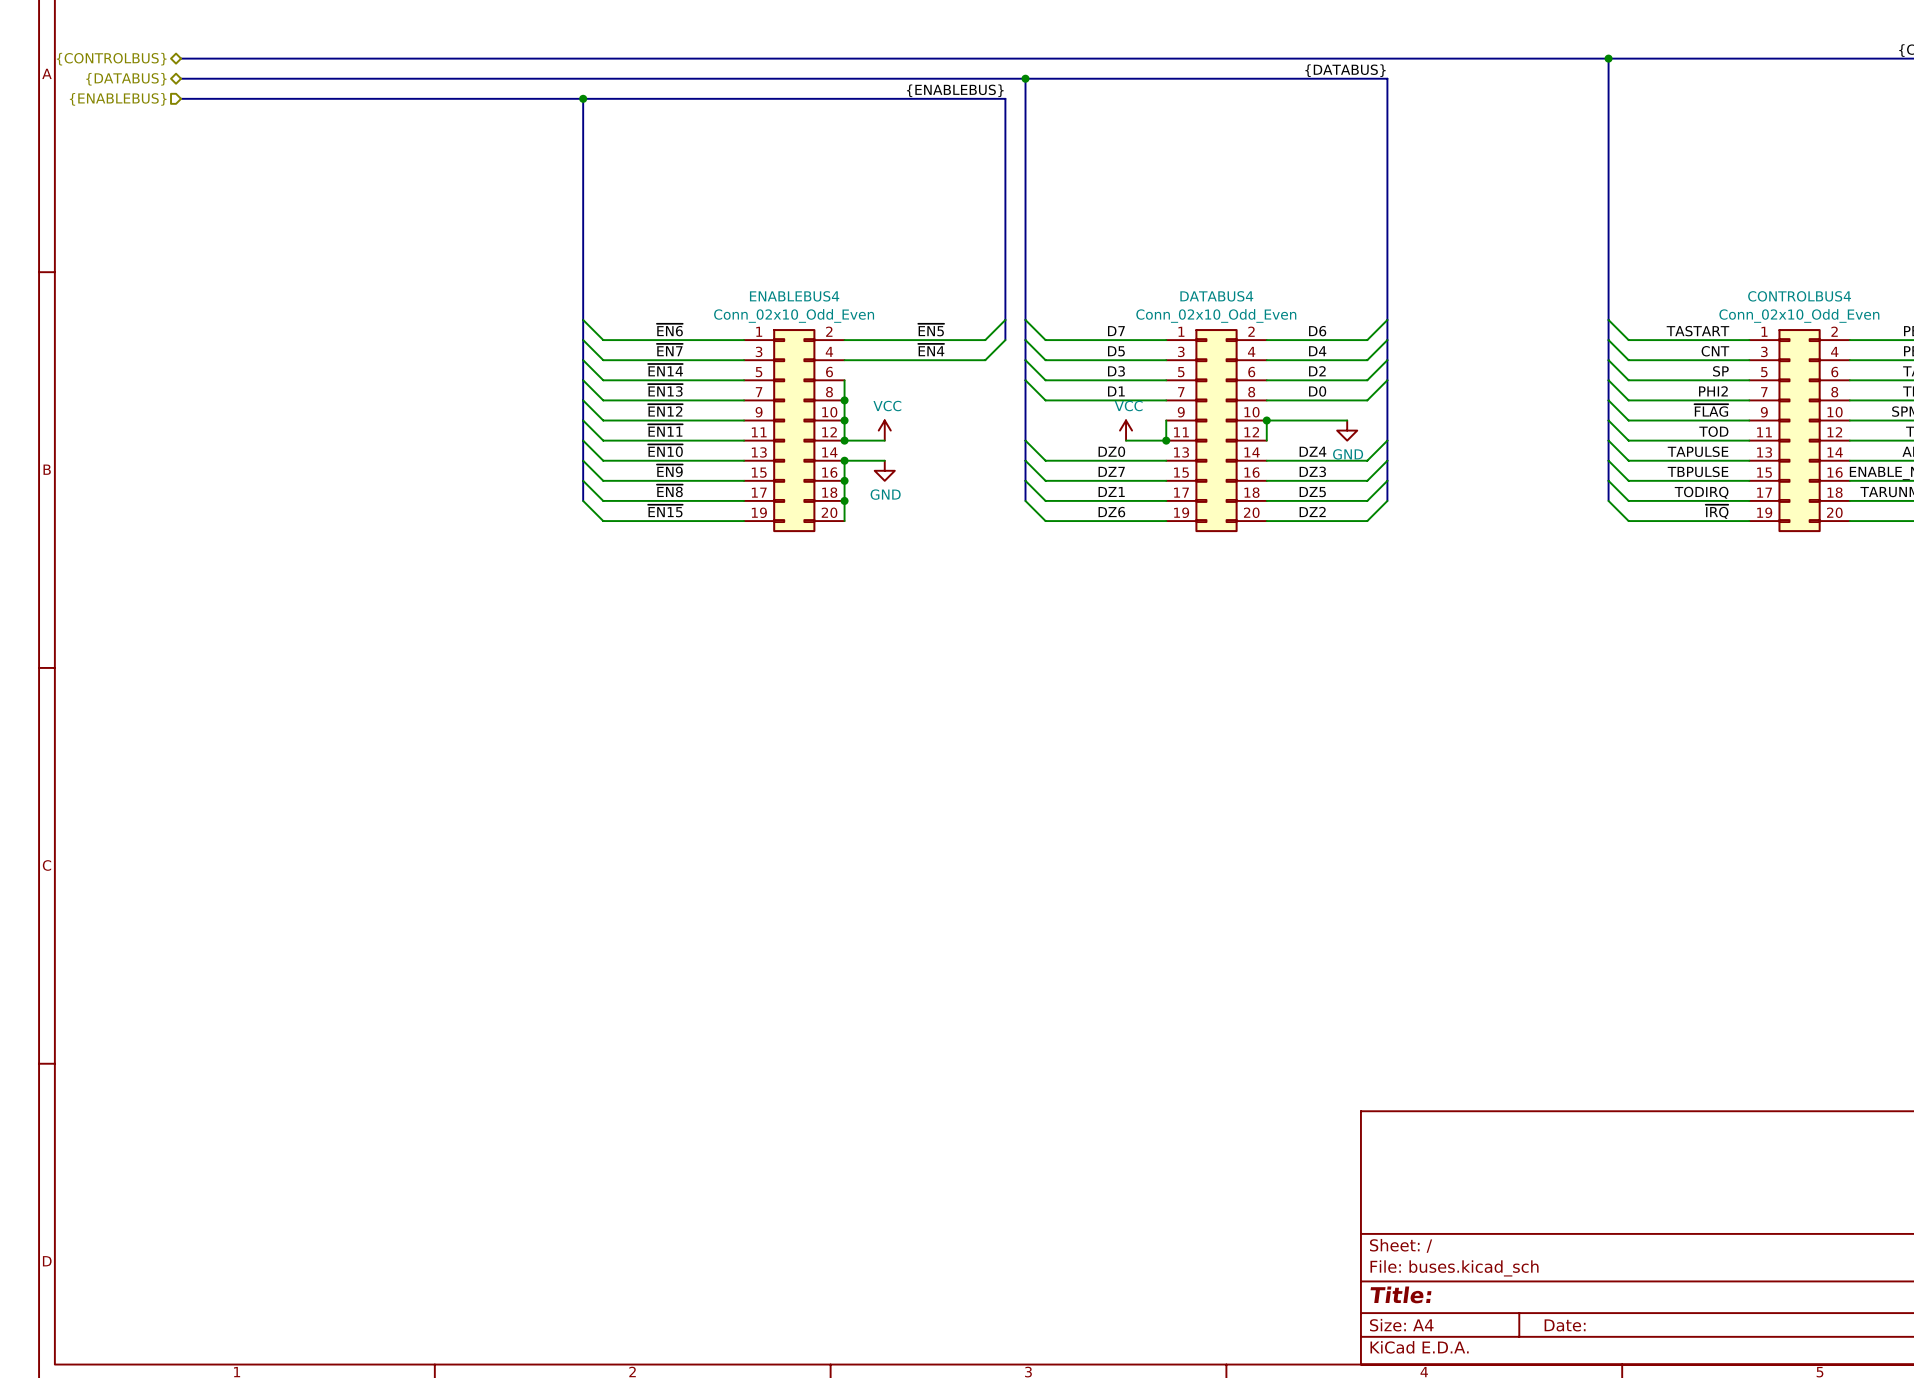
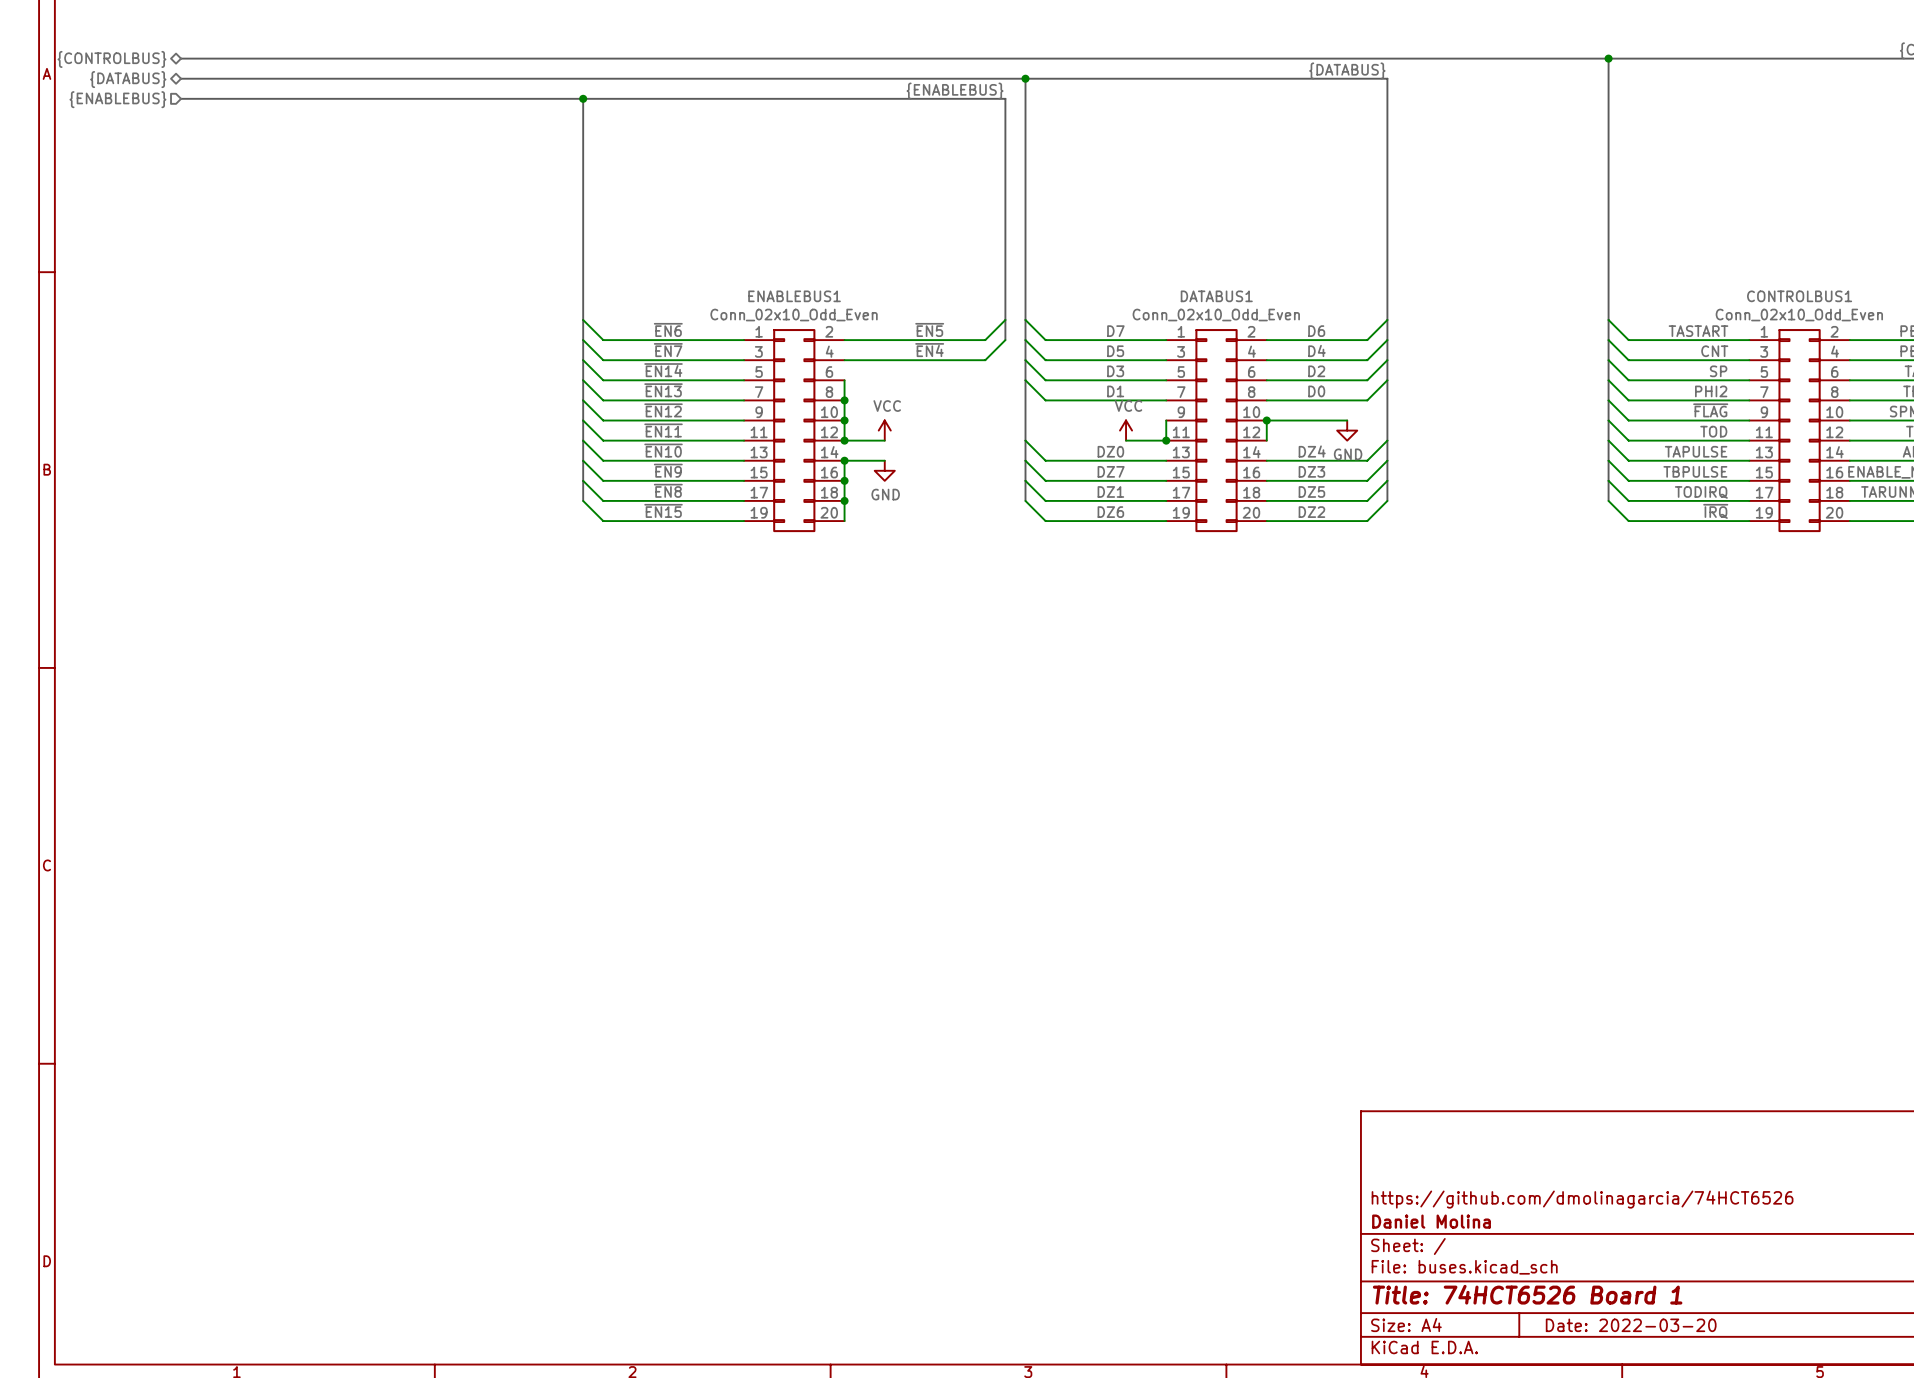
ENABLEBUS4 name: ENABLEBUS4 (794, 296) -> ENABLEBUS1 (794, 296)
DATABUS4 name: DATABUS4 (1216, 296) -> DATABUS1 (1216, 296)
CONTROLBUS4 name: CONTROLBUS4 (1799, 296) -> CONTROLBUS1 (1799, 296)
title block: none -> https://github.com/dmolinagarcia/74HCT6526 (1582, 1199)
title block: none -> Daniel Molina (1431, 1221)
title block: Title: (1401, 1294) -> Title: 74HCT6526 Board 1 (1527, 1294)
title block: Date: (1565, 1325) -> Date: 2022-03-20 (1631, 1325)

